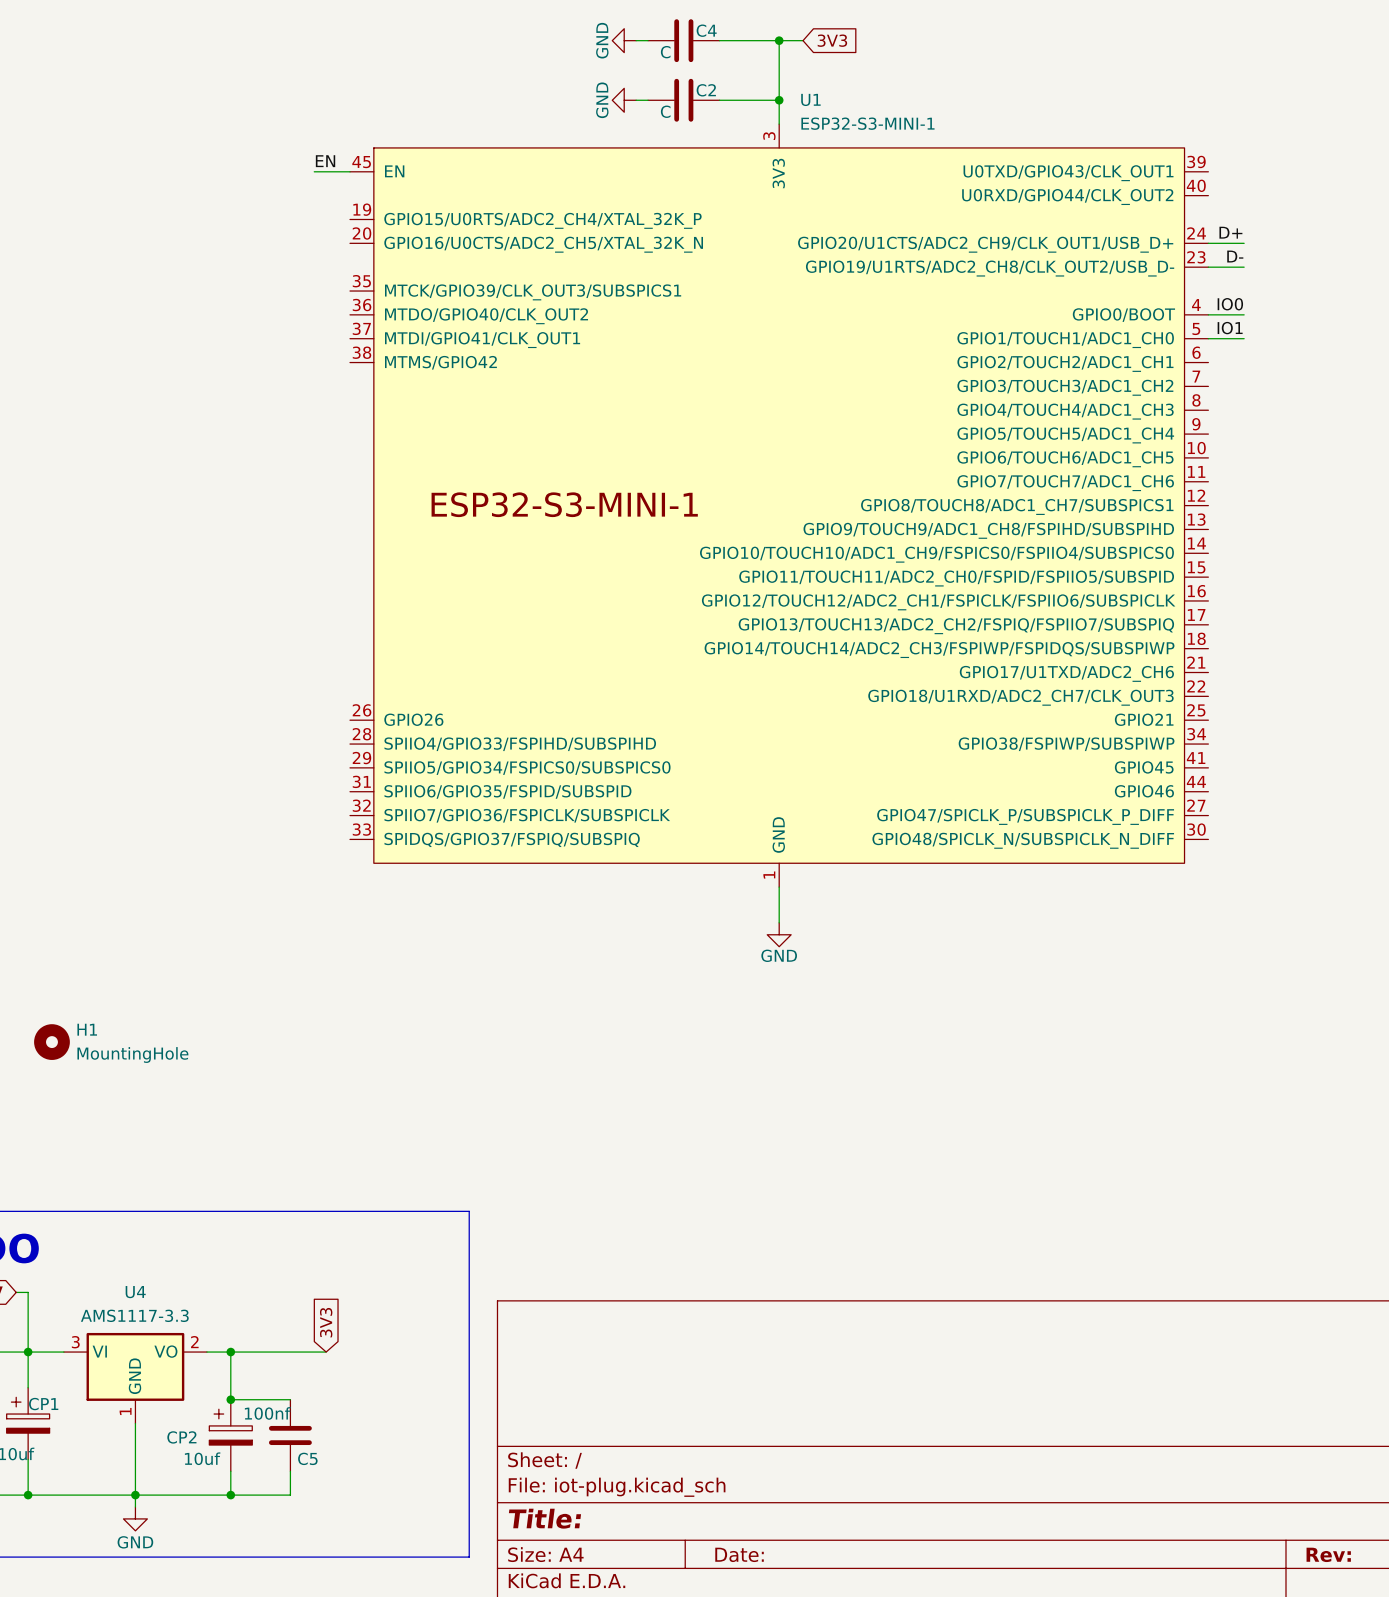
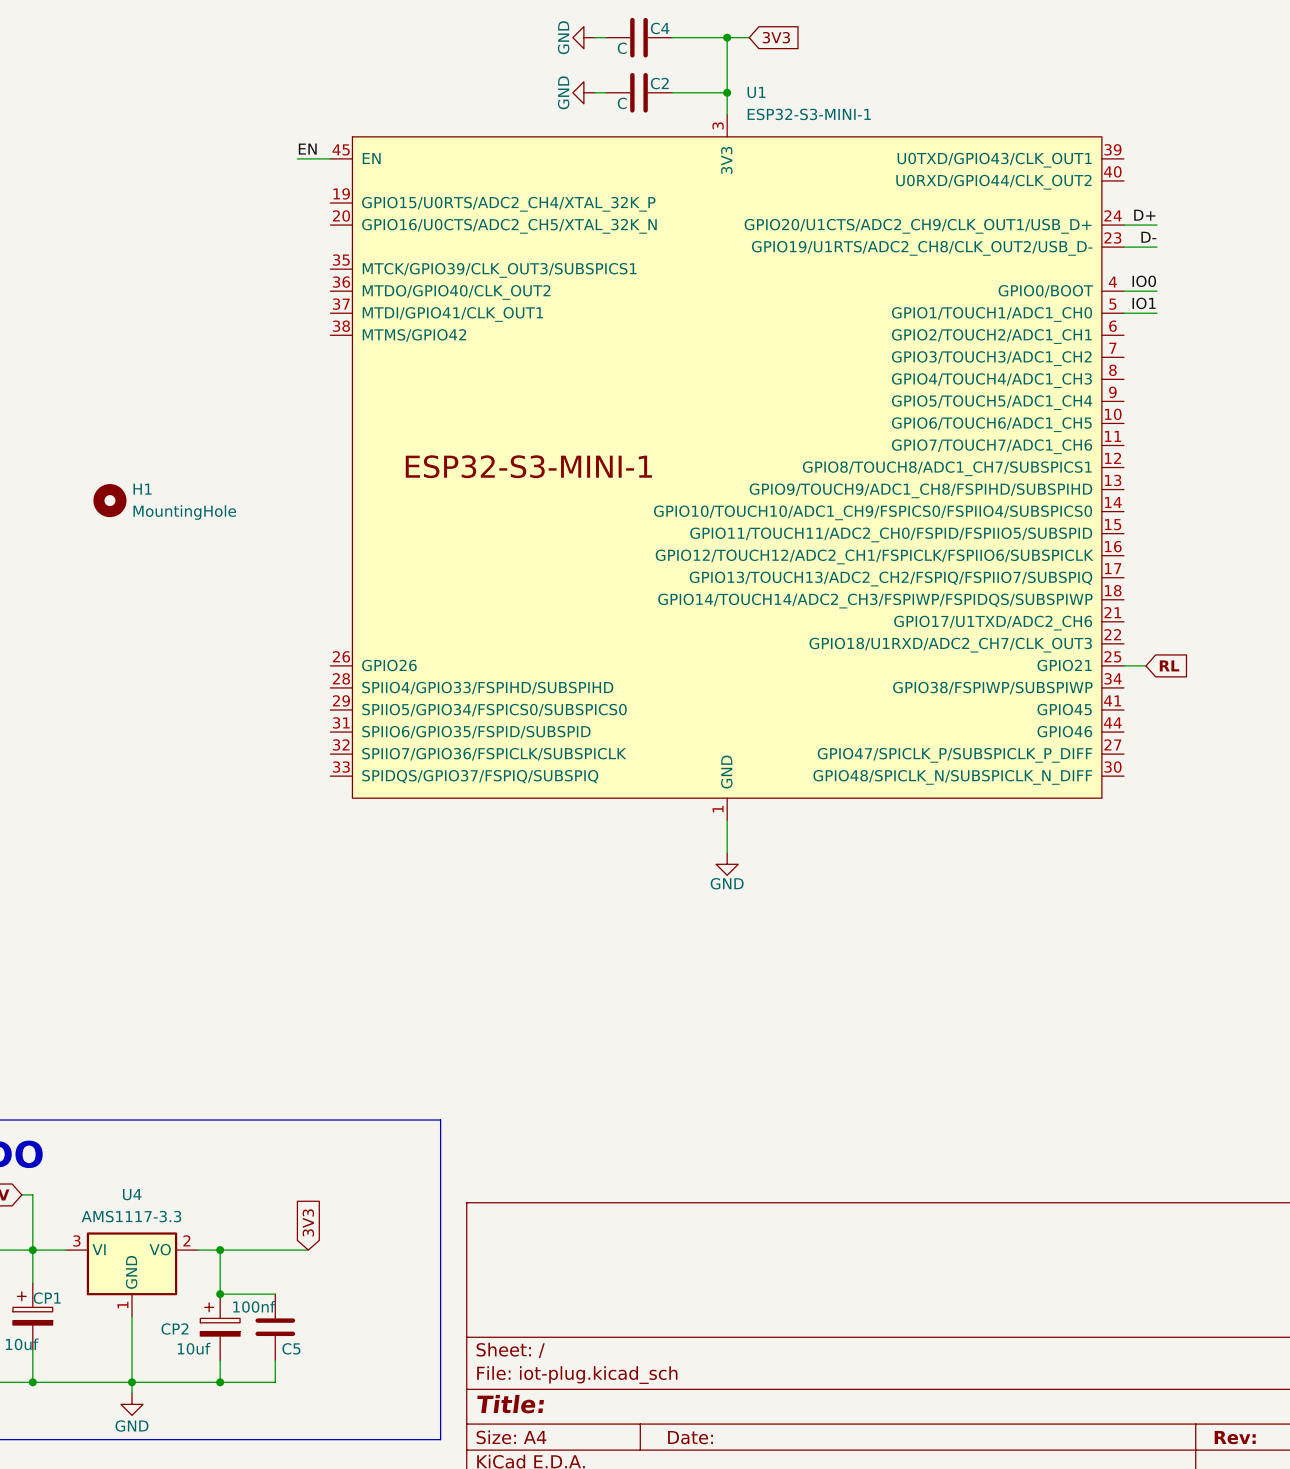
wire: none -> (1123, 665) (1146, 665)
global label: none -> RL (1169, 665)
H1 position: (51, 1042) -> (109, 500)

